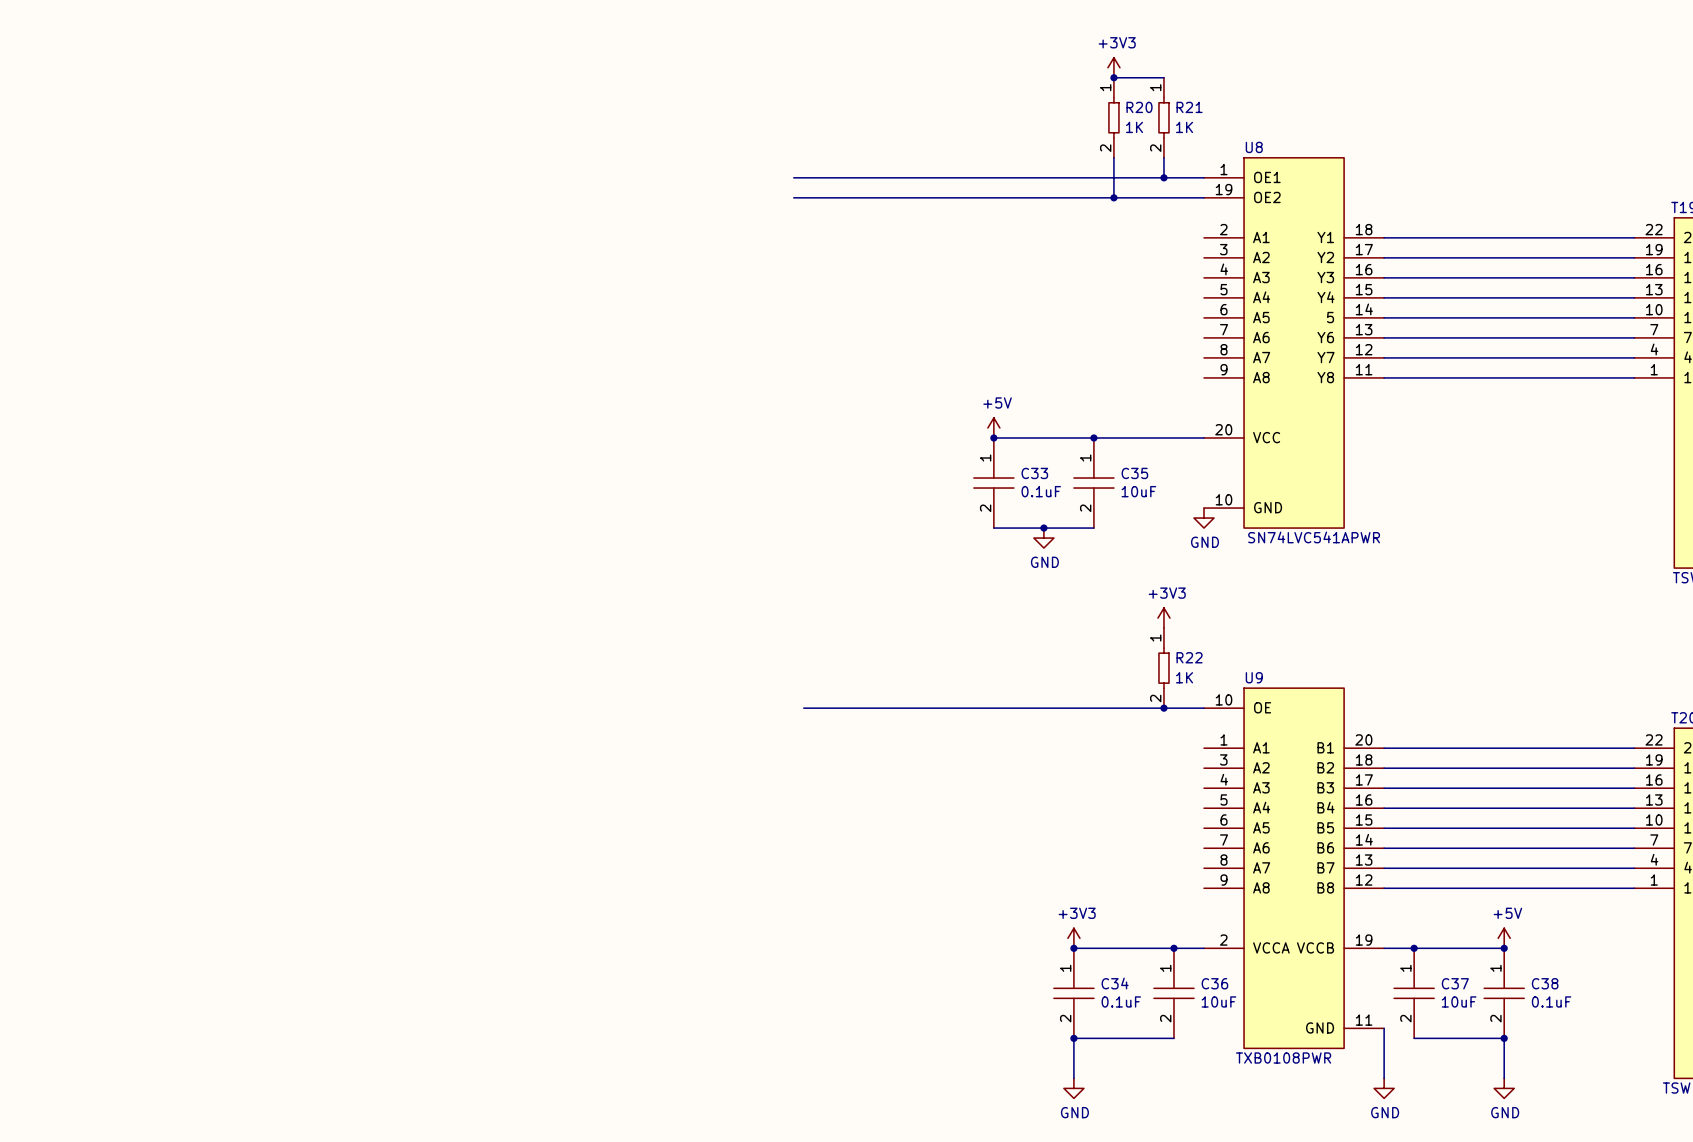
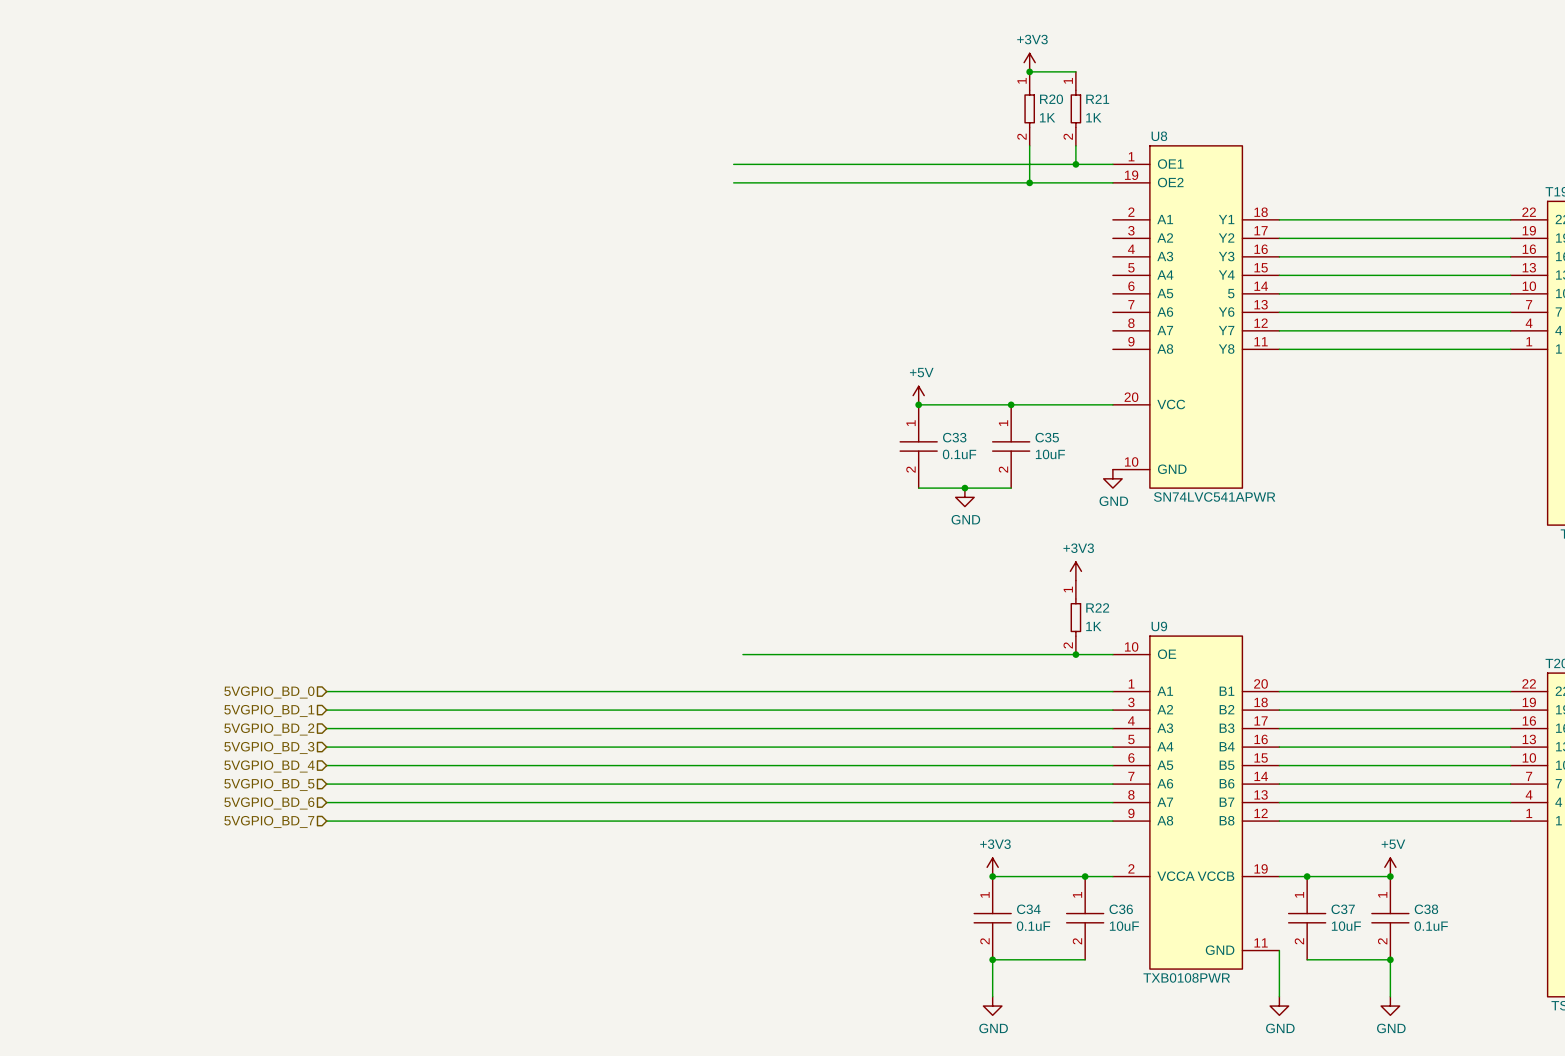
hierarchical label: none -> 5VGPIO_BD_0 (269, 692)
wire: none -> (326, 691) (1112, 691)
hierarchical label: none -> 5VGPIO_BD_1 (269, 710)
wire: none -> (326, 710) (1112, 710)
hierarchical label: none -> 5VGPIO_BD_2 (269, 729)
wire: none -> (326, 728) (1112, 728)
hierarchical label: none -> 5VGPIO_BD_3 (269, 747)
wire: none -> (326, 747) (1112, 747)
hierarchical label: none -> 5VGPIO_BD_4 (269, 766)
wire: none -> (326, 765) (1112, 765)
hierarchical label: none -> 5VGPIO_BD_5 (269, 784)
wire: none -> (326, 784) (1112, 784)
hierarchical label: none -> 5VGPIO_BD_6 (269, 803)
wire: none -> (326, 802) (1112, 802)
hierarchical label: none -> 5VGPIO_BD_7 (269, 821)
wire: none -> (326, 821) (1112, 821)

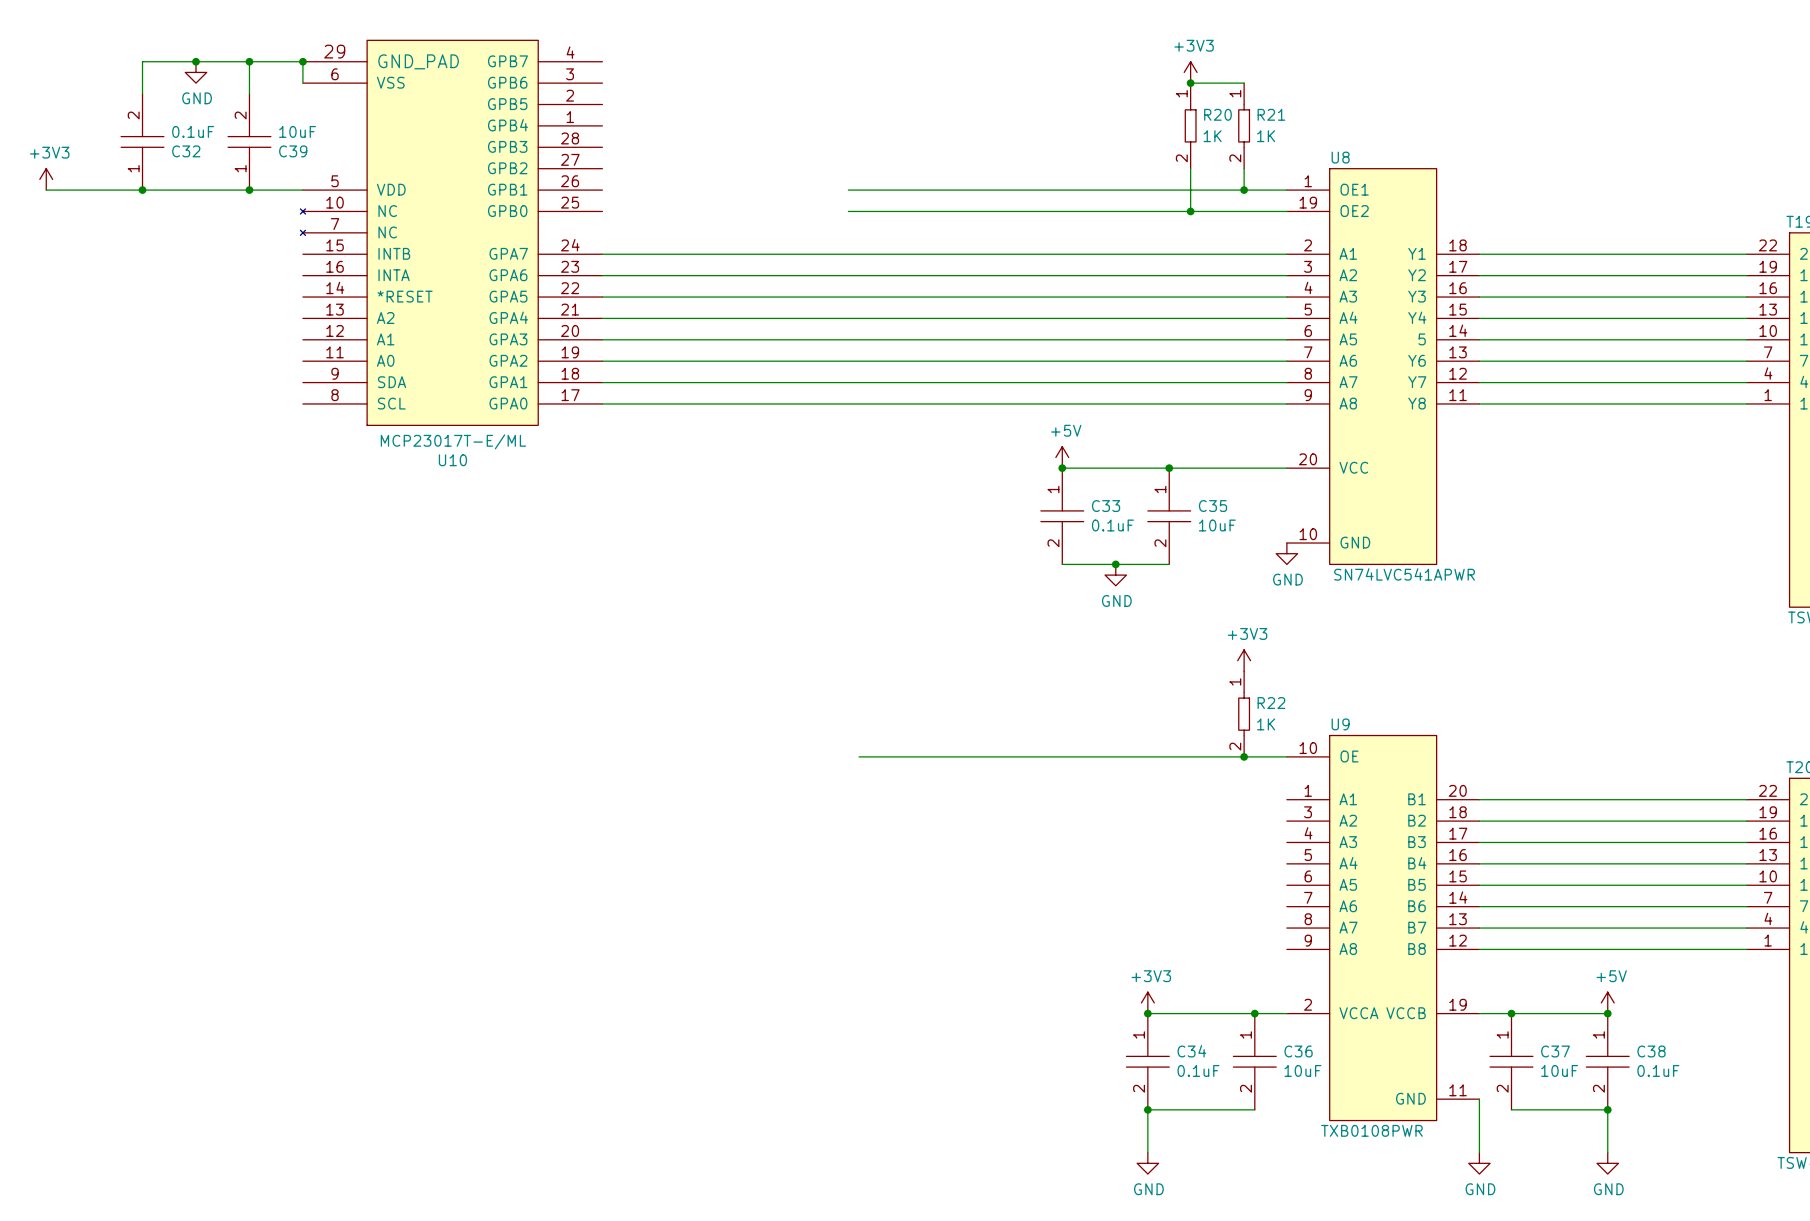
junction: none -> (195, 61)
wire: none -> (249, 61) (249, 93)
junction: none -> (249, 61)
junction: none -> (302, 61)
power symbol: none -> GND (195, 72)
wire: none -> (302, 83) (302, 61) (142, 61) (142, 93)
C32: none -> (142, 141)
C39: none -> (249, 141)
power symbol: none -> +3V3 (46, 179)
wire: none -> (46, 190) (302, 190)
junction: none -> (142, 190)
junction: none -> (249, 190)
U10: none -> (451, 232)
wire: none -> (602, 254) (1286, 254)
wire: none -> (602, 275) (1286, 275)
wire: none -> (602, 297) (1286, 297)
wire: none -> (602, 318) (1286, 318)
wire: none -> (602, 339) (1286, 339)
wire: none -> (602, 361) (1286, 361)
wire: none -> (602, 382) (1286, 382)
wire: none -> (602, 403) (1286, 403)
wire: (326, 691) (1112, 691) -> none
hierarchical label: 5VGPIO_BD_0 (269, 692) -> none
hierarchical label: 5VGPIO_BD_1 (269, 710) -> none
wire: (326, 710) (1112, 710) -> none
wire: (326, 728) (1112, 728) -> none
hierarchical label: 5VGPIO_BD_2 (269, 729) -> none
hierarchical label: 5VGPIO_BD_3 (269, 747) -> none
wire: (326, 747) (1112, 747) -> none
wire: (326, 765) (1112, 765) -> none
hierarchical label: 5VGPIO_BD_4 (269, 766) -> none
hierarchical label: 5VGPIO_BD_5 (269, 784) -> none
wire: (326, 784) (1112, 784) -> none
wire: (326, 802) (1112, 802) -> none
hierarchical label: 5VGPIO_BD_6 (269, 803) -> none
hierarchical label: 5VGPIO_BD_7 (269, 821) -> none
wire: (326, 821) (1112, 821) -> none

